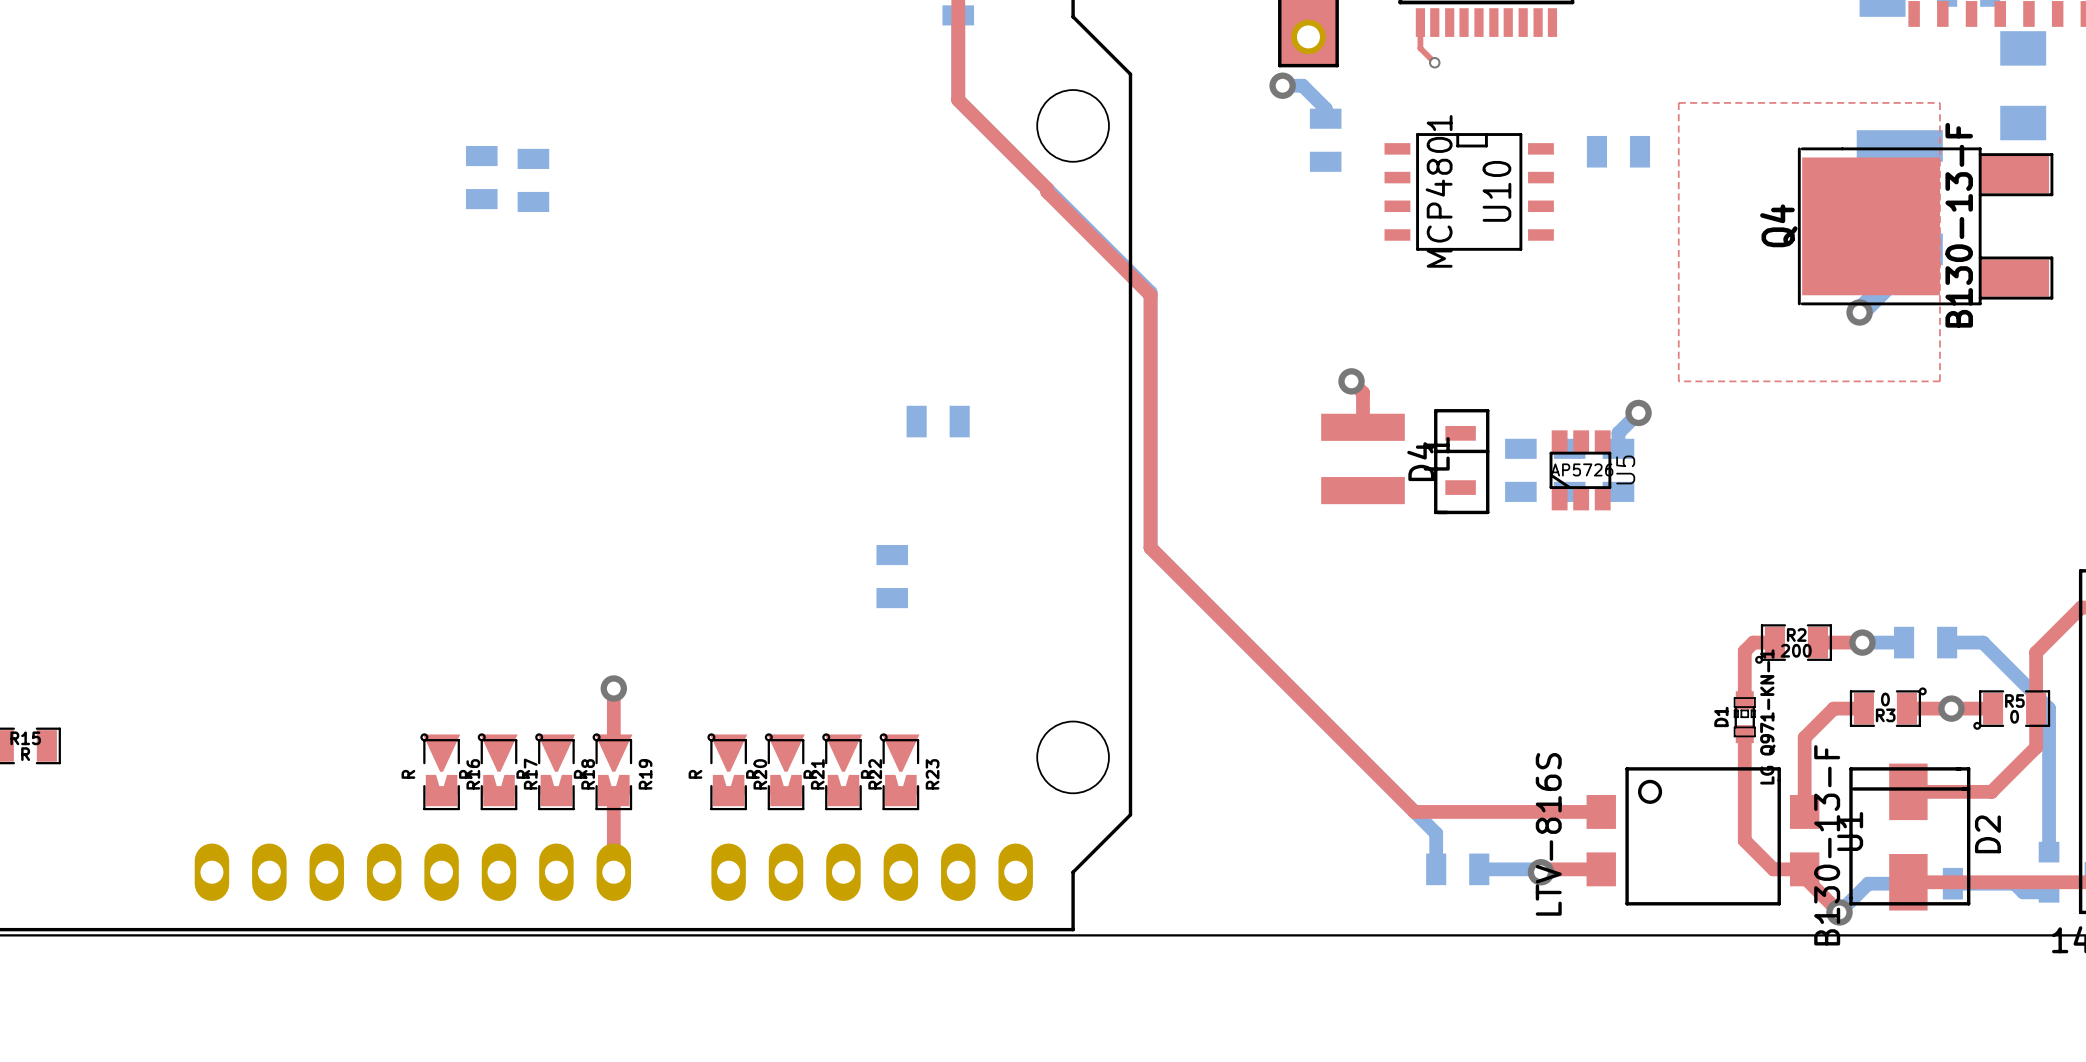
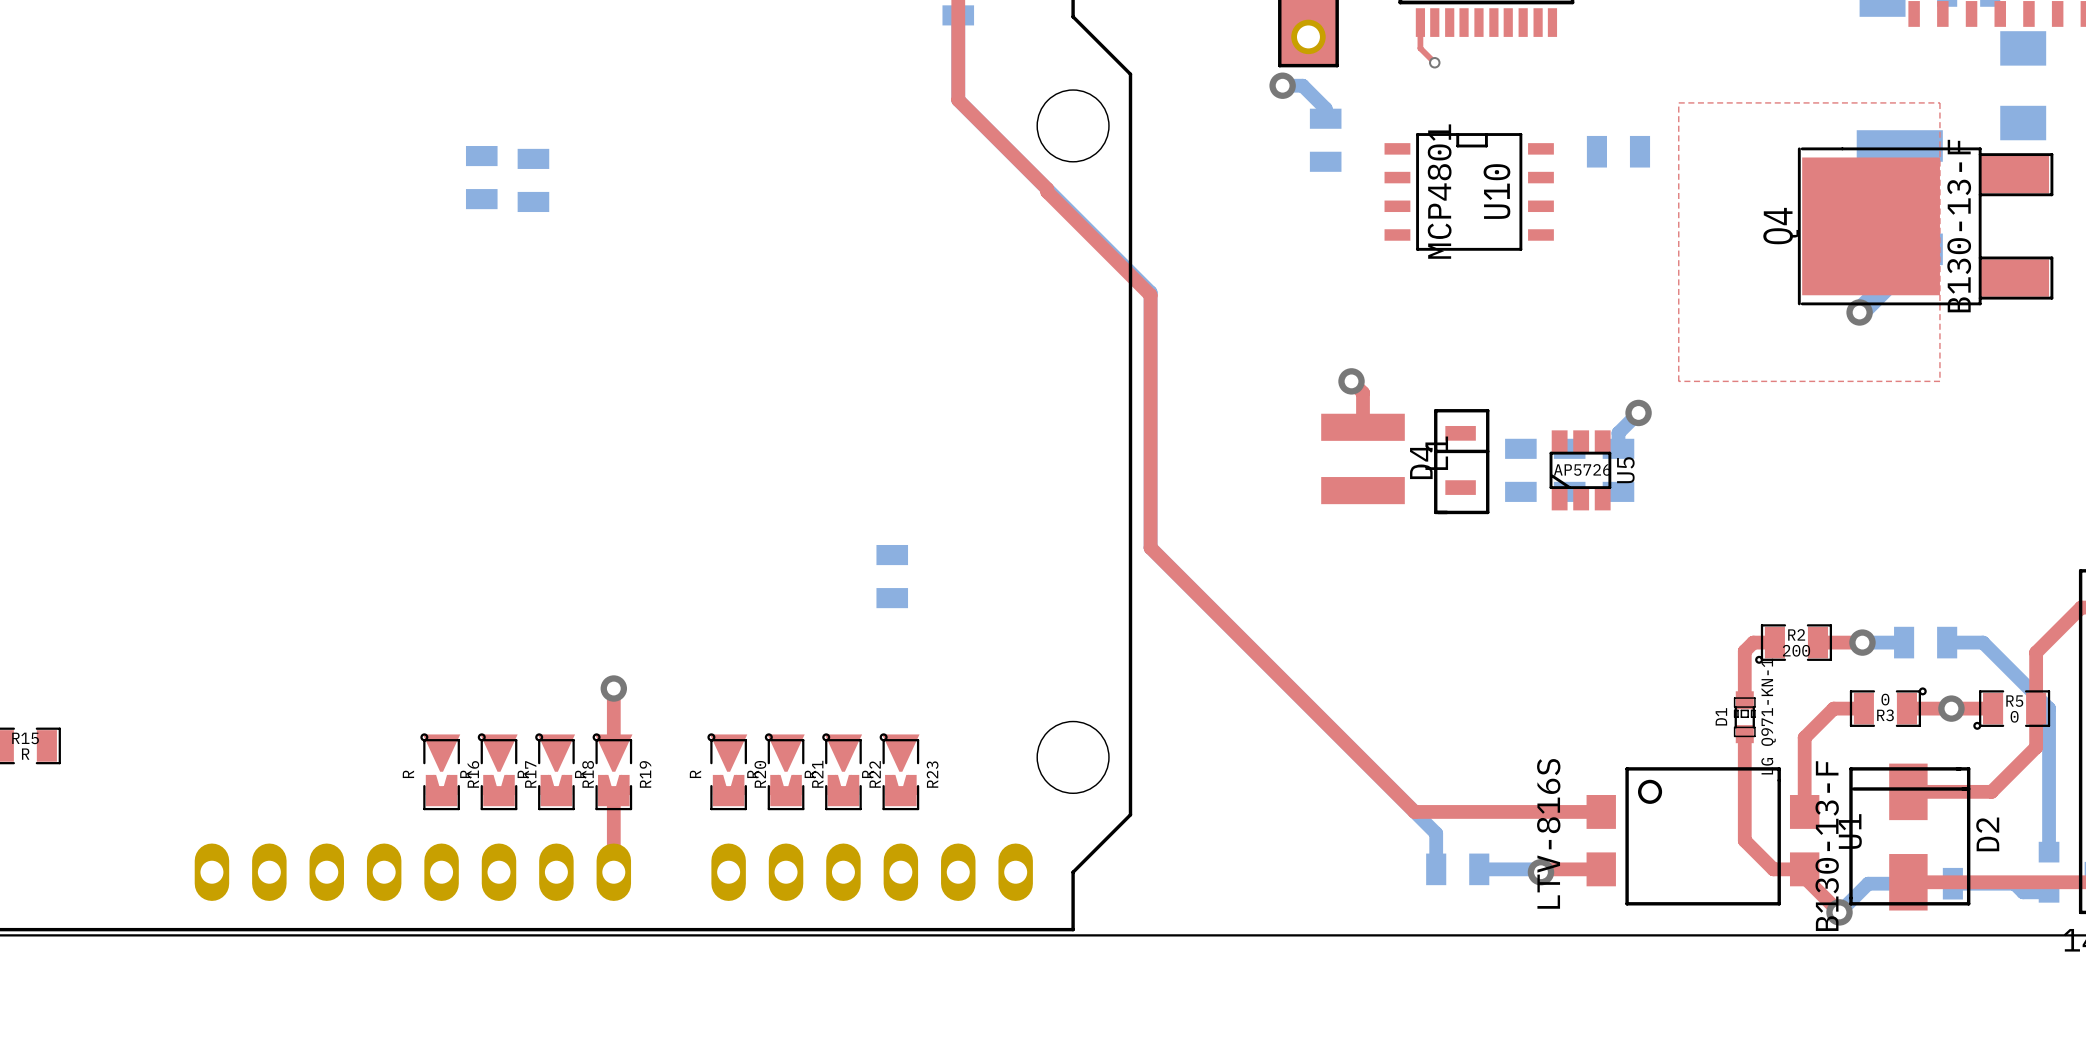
part: (938, 421) -> none

